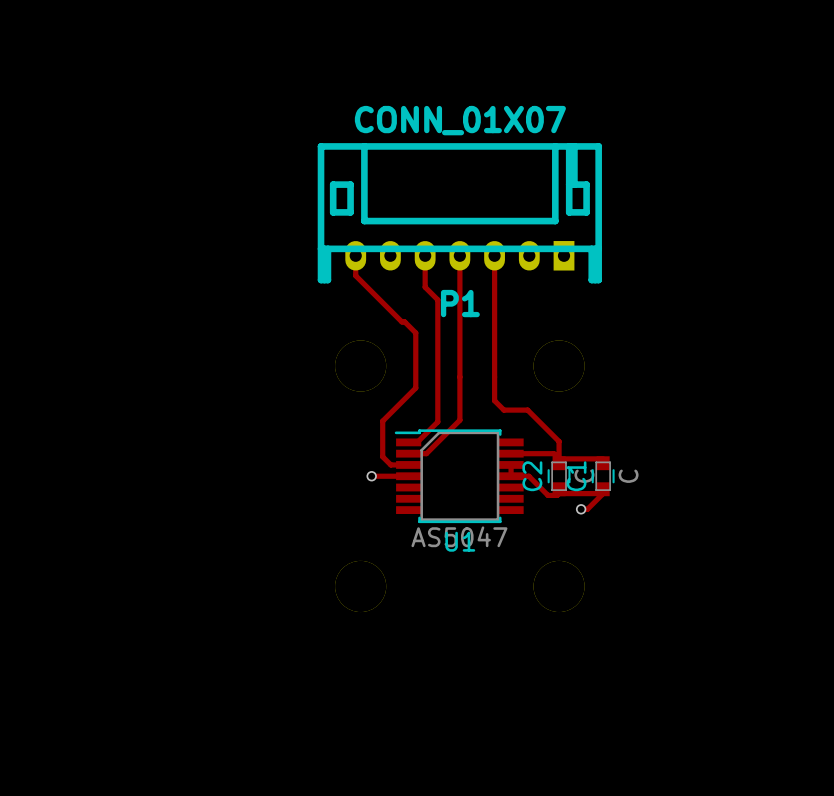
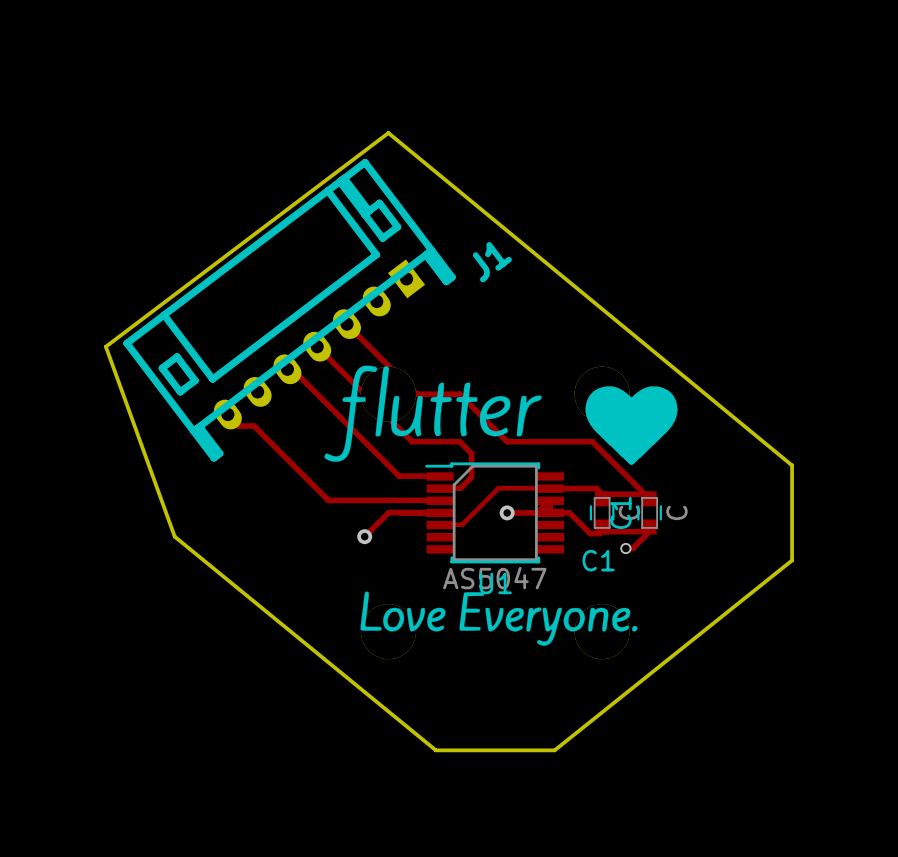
board edge: none -> (388, 133) (105, 346) (174, 536) (435, 750) (554, 750) (792, 560) (792, 465) (388, 133)
P1: CONN_01X07 (459, 213) -> none
track: (355, 255) (355, 275) (401, 321) (404, 321) (415, 332) (415, 388) (382, 421) (382, 456) (390, 464) (408, 464) -> none
track: (425, 255) (425, 287) (437, 299) (437, 421) -> (317, 346) (412, 441) (459, 441) (471, 453)
track: (459, 255) (459, 420) (426, 453) (408, 453) -> none
track: (494, 255) (494, 400) (503, 410) -> (347, 325) (416, 394) (459, 394) (507, 441) (542, 441)
J1: none -> (289, 310)
drawing: none -> [324, 365, 542, 462]
track: none -> (290, 373) (296, 373) (399, 476) (439, 476)
drawing: none -> [585, 386, 678, 465]
track: none -> (225, 411) (237, 423) (237, 426) (254, 426) (328, 500) (439, 500)
track: (527, 410) (559, 441) (559, 458) -> (568, 441) (592, 441) (649, 498)
track: (437, 421) (417, 442) -> (471, 454) (471, 477) (460, 488) (440, 489)
track: none -> (549, 488) (498, 488) (462, 524) (439, 524)
track: none -> (549, 500) (537, 512) (507, 512)
track: none -> (439, 512) (388, 512) (364, 536)
via: (371, 476) -> none
via: none -> (507, 512)
C2 name: C2 (532, 476) -> C1 (598, 560)
via: none -> (364, 536)
drawing: none -> [360, 591, 638, 646]

